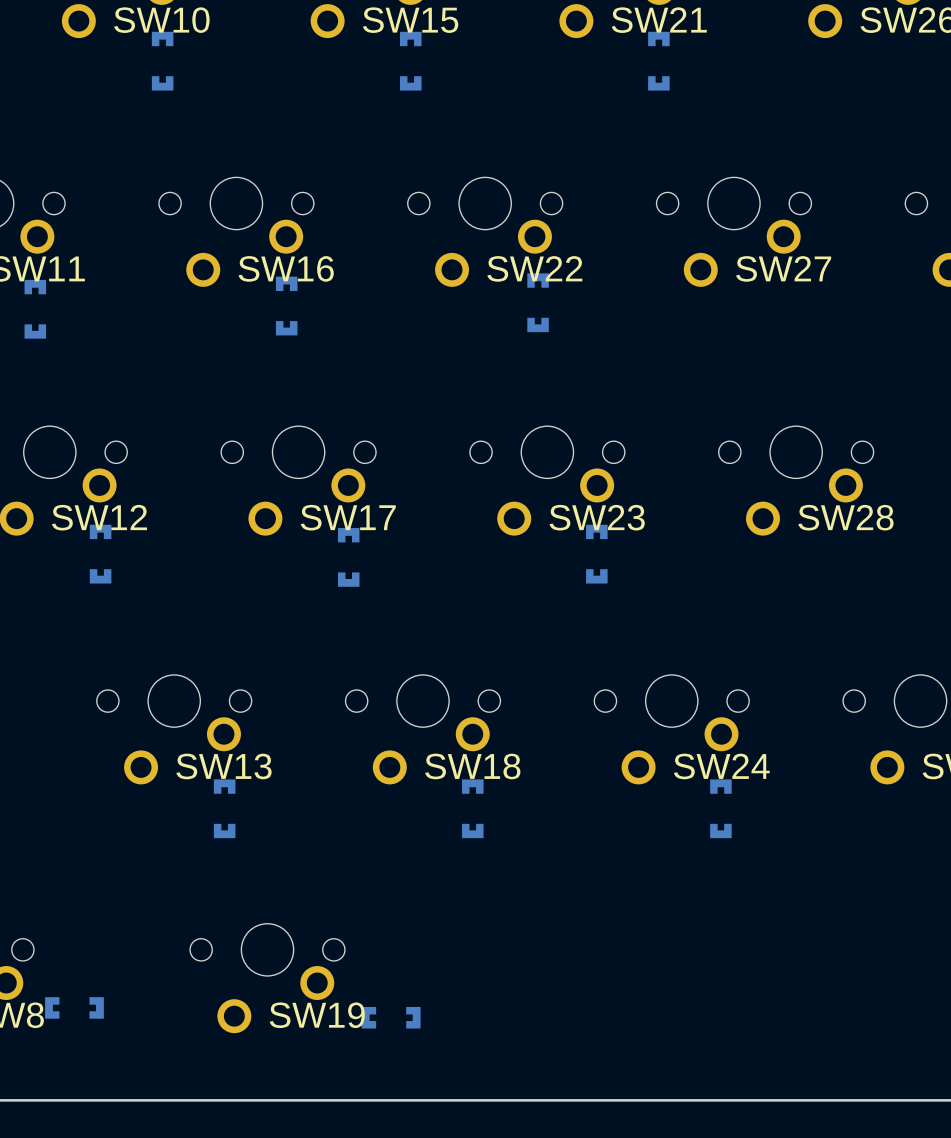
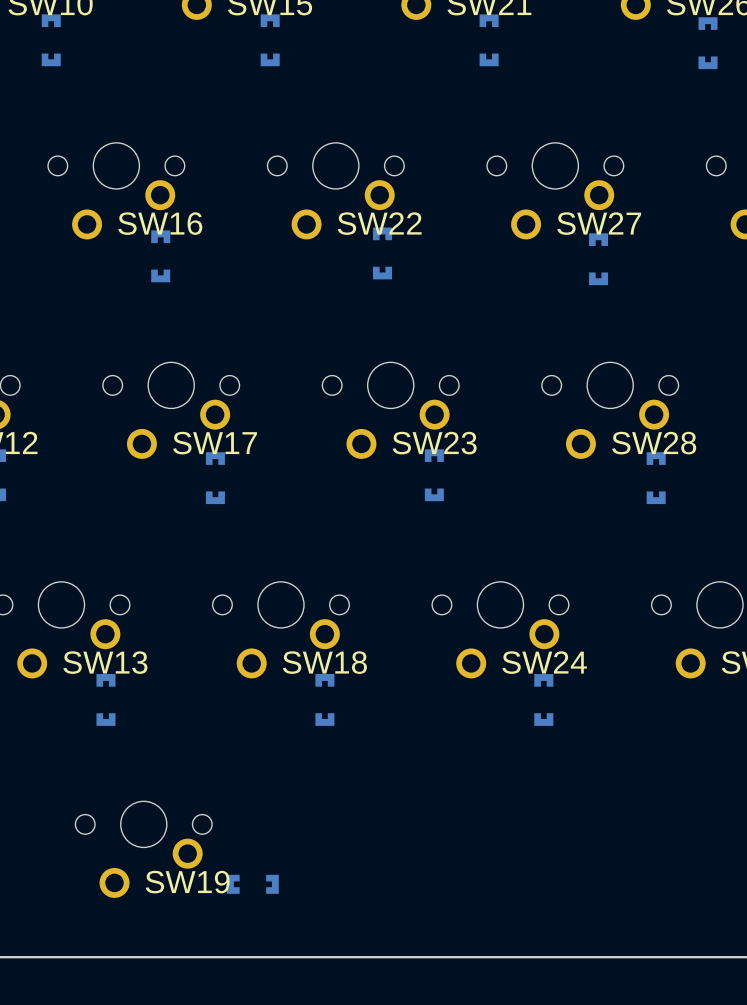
part: none -> (708, 43)
part: none -> (598, 259)
part: none -> (656, 478)

